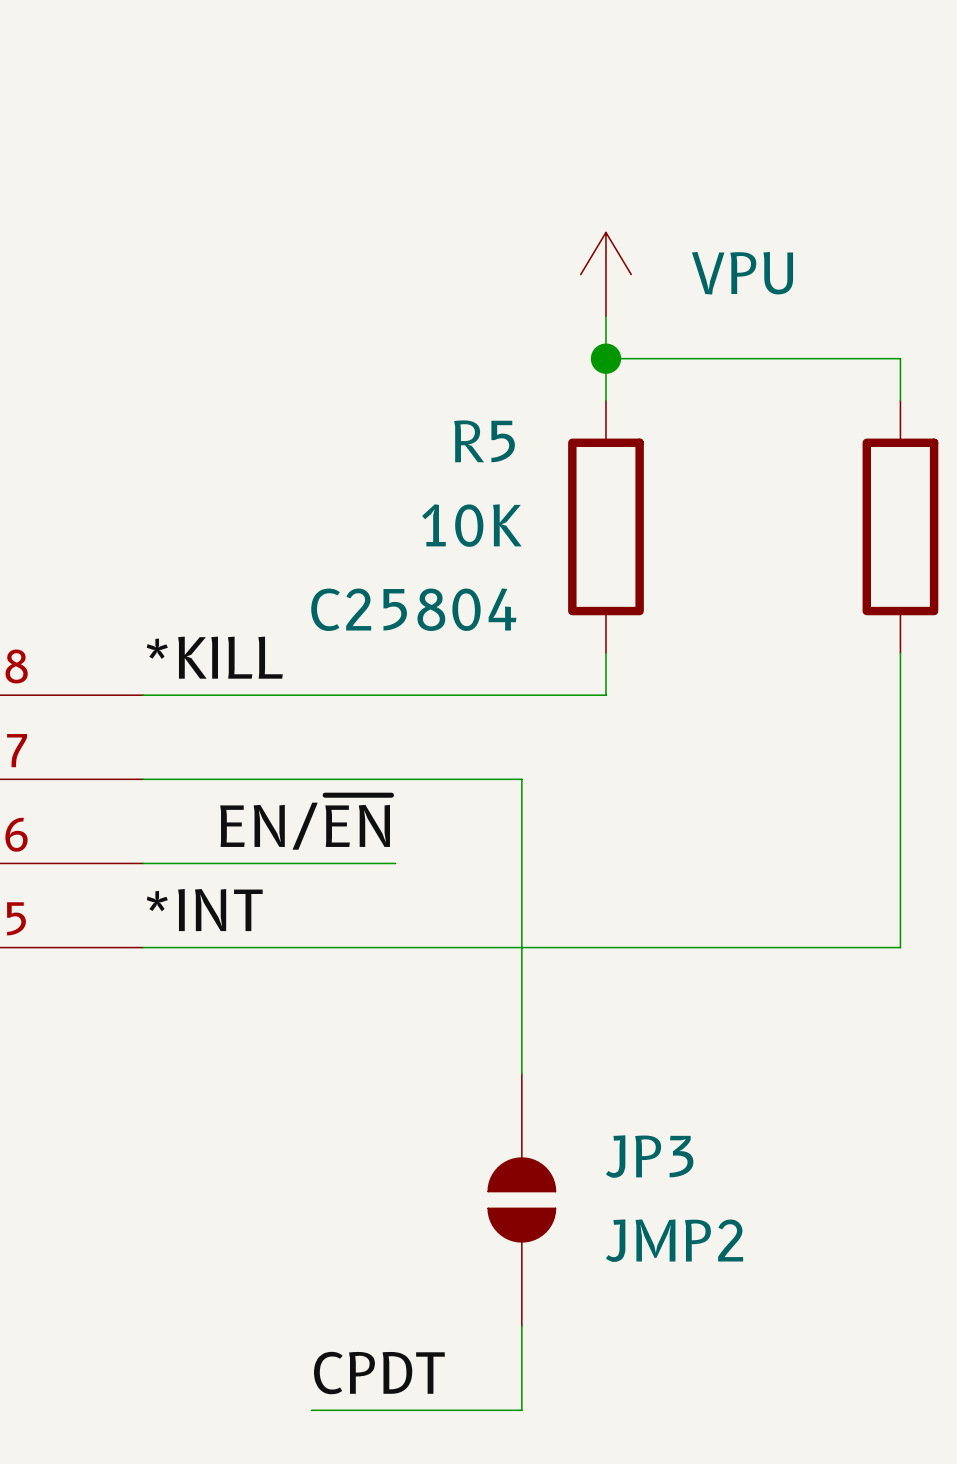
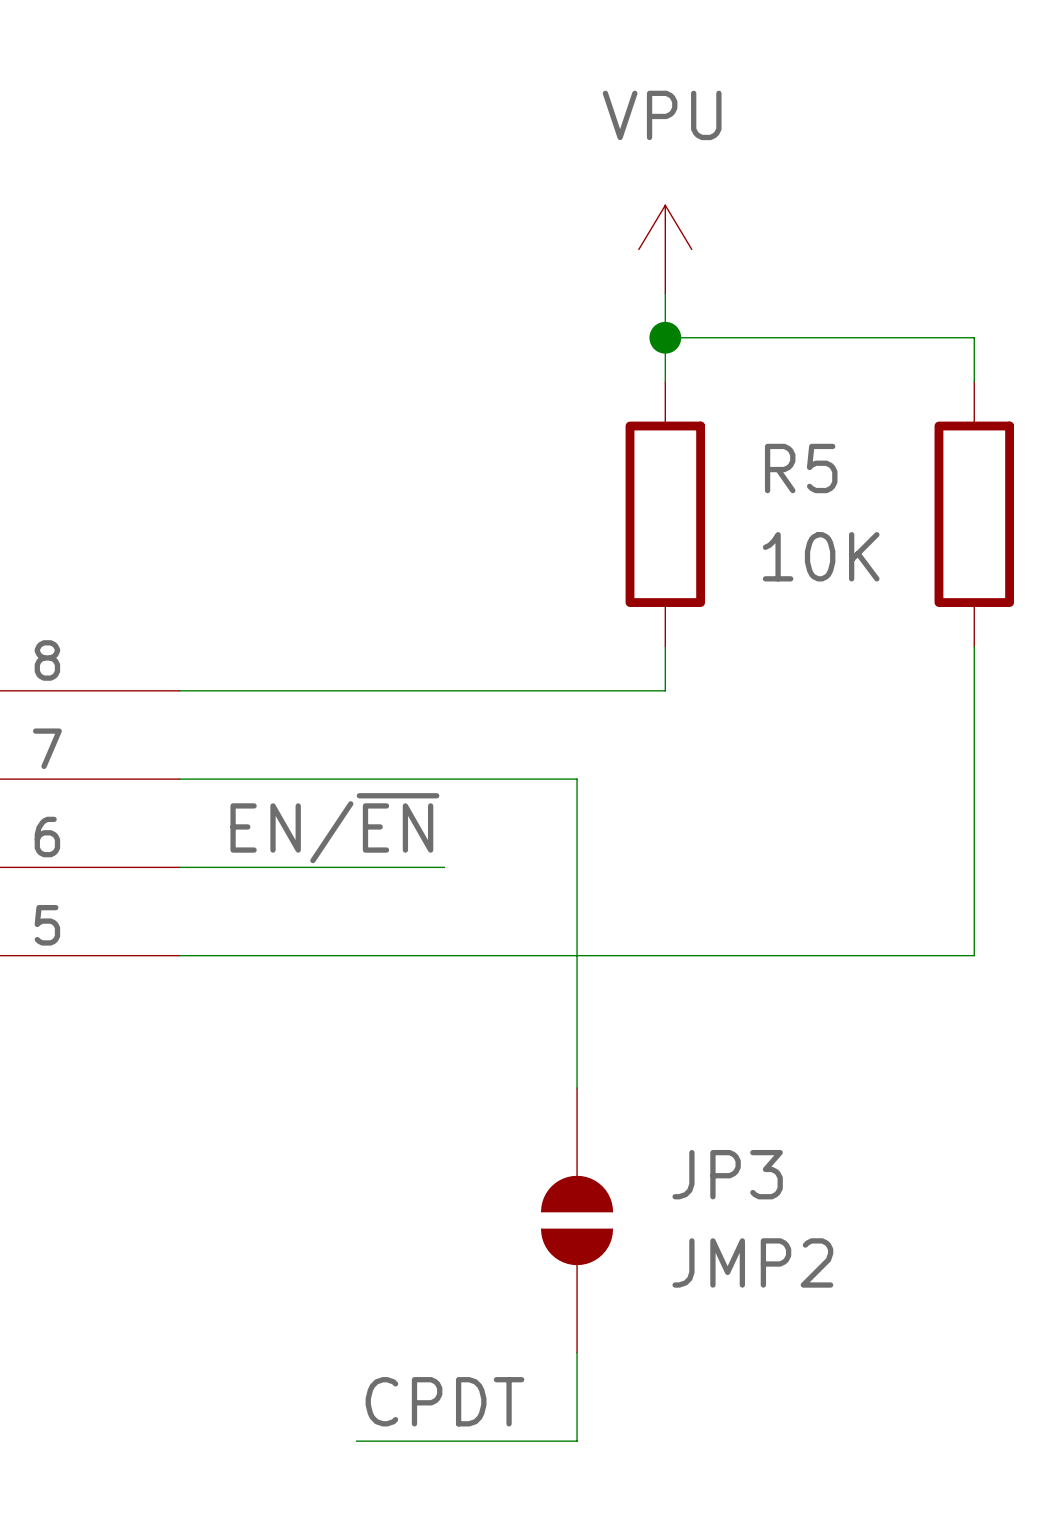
power symbol text position: VPU (742, 273) -> VPU (662, 115)
R5 name position: R5 (484, 441) -> R5 (801, 468)
R5 value position: 10K (471, 525) -> 10K (821, 556)
R5 text: C25804 (413, 609) -> none
label: *KILL (214, 657) -> none
label: *INT (204, 910) -> none

